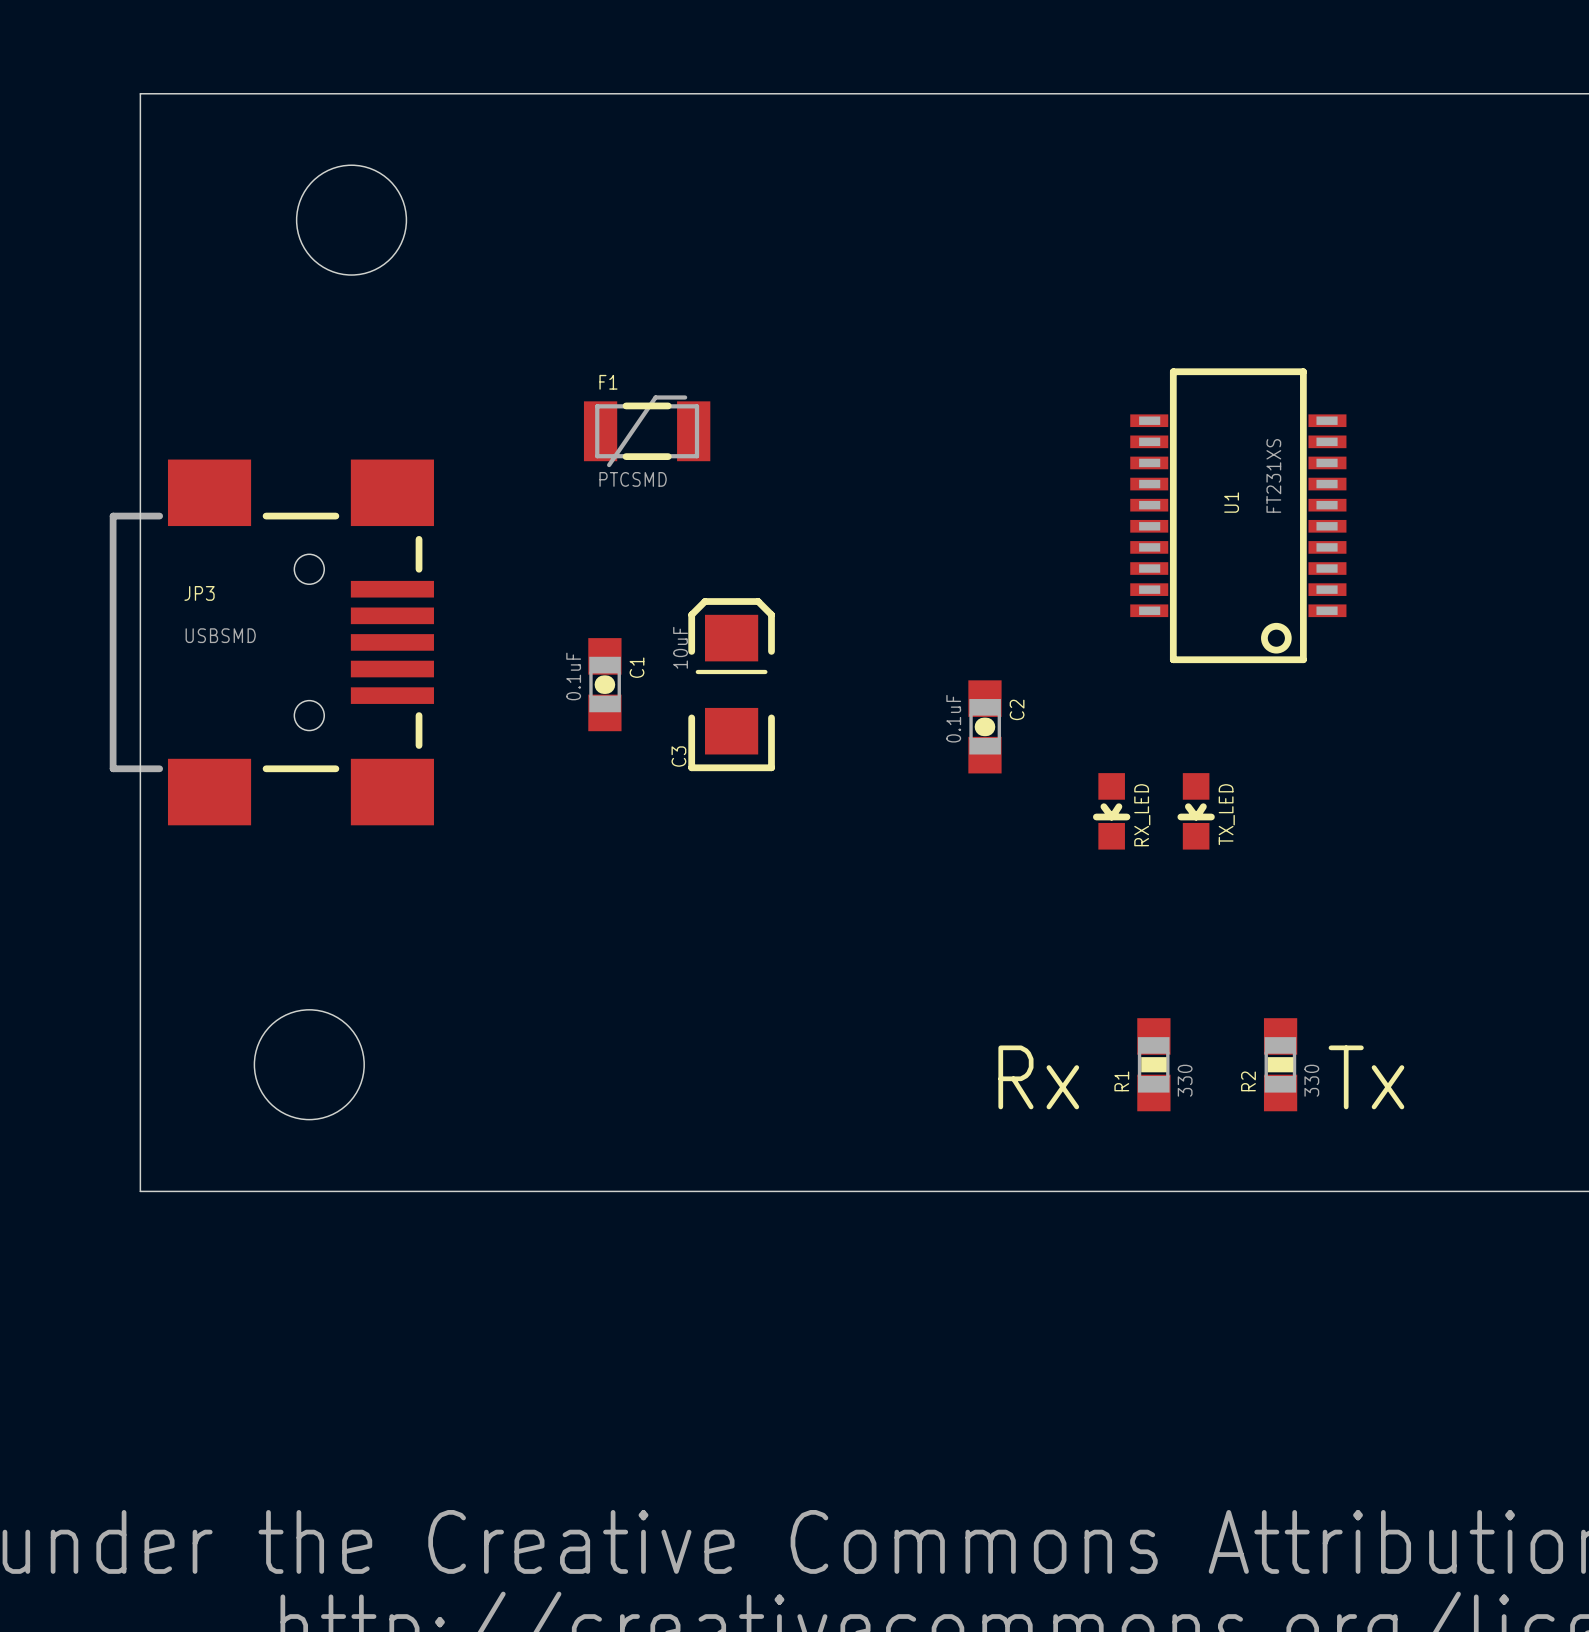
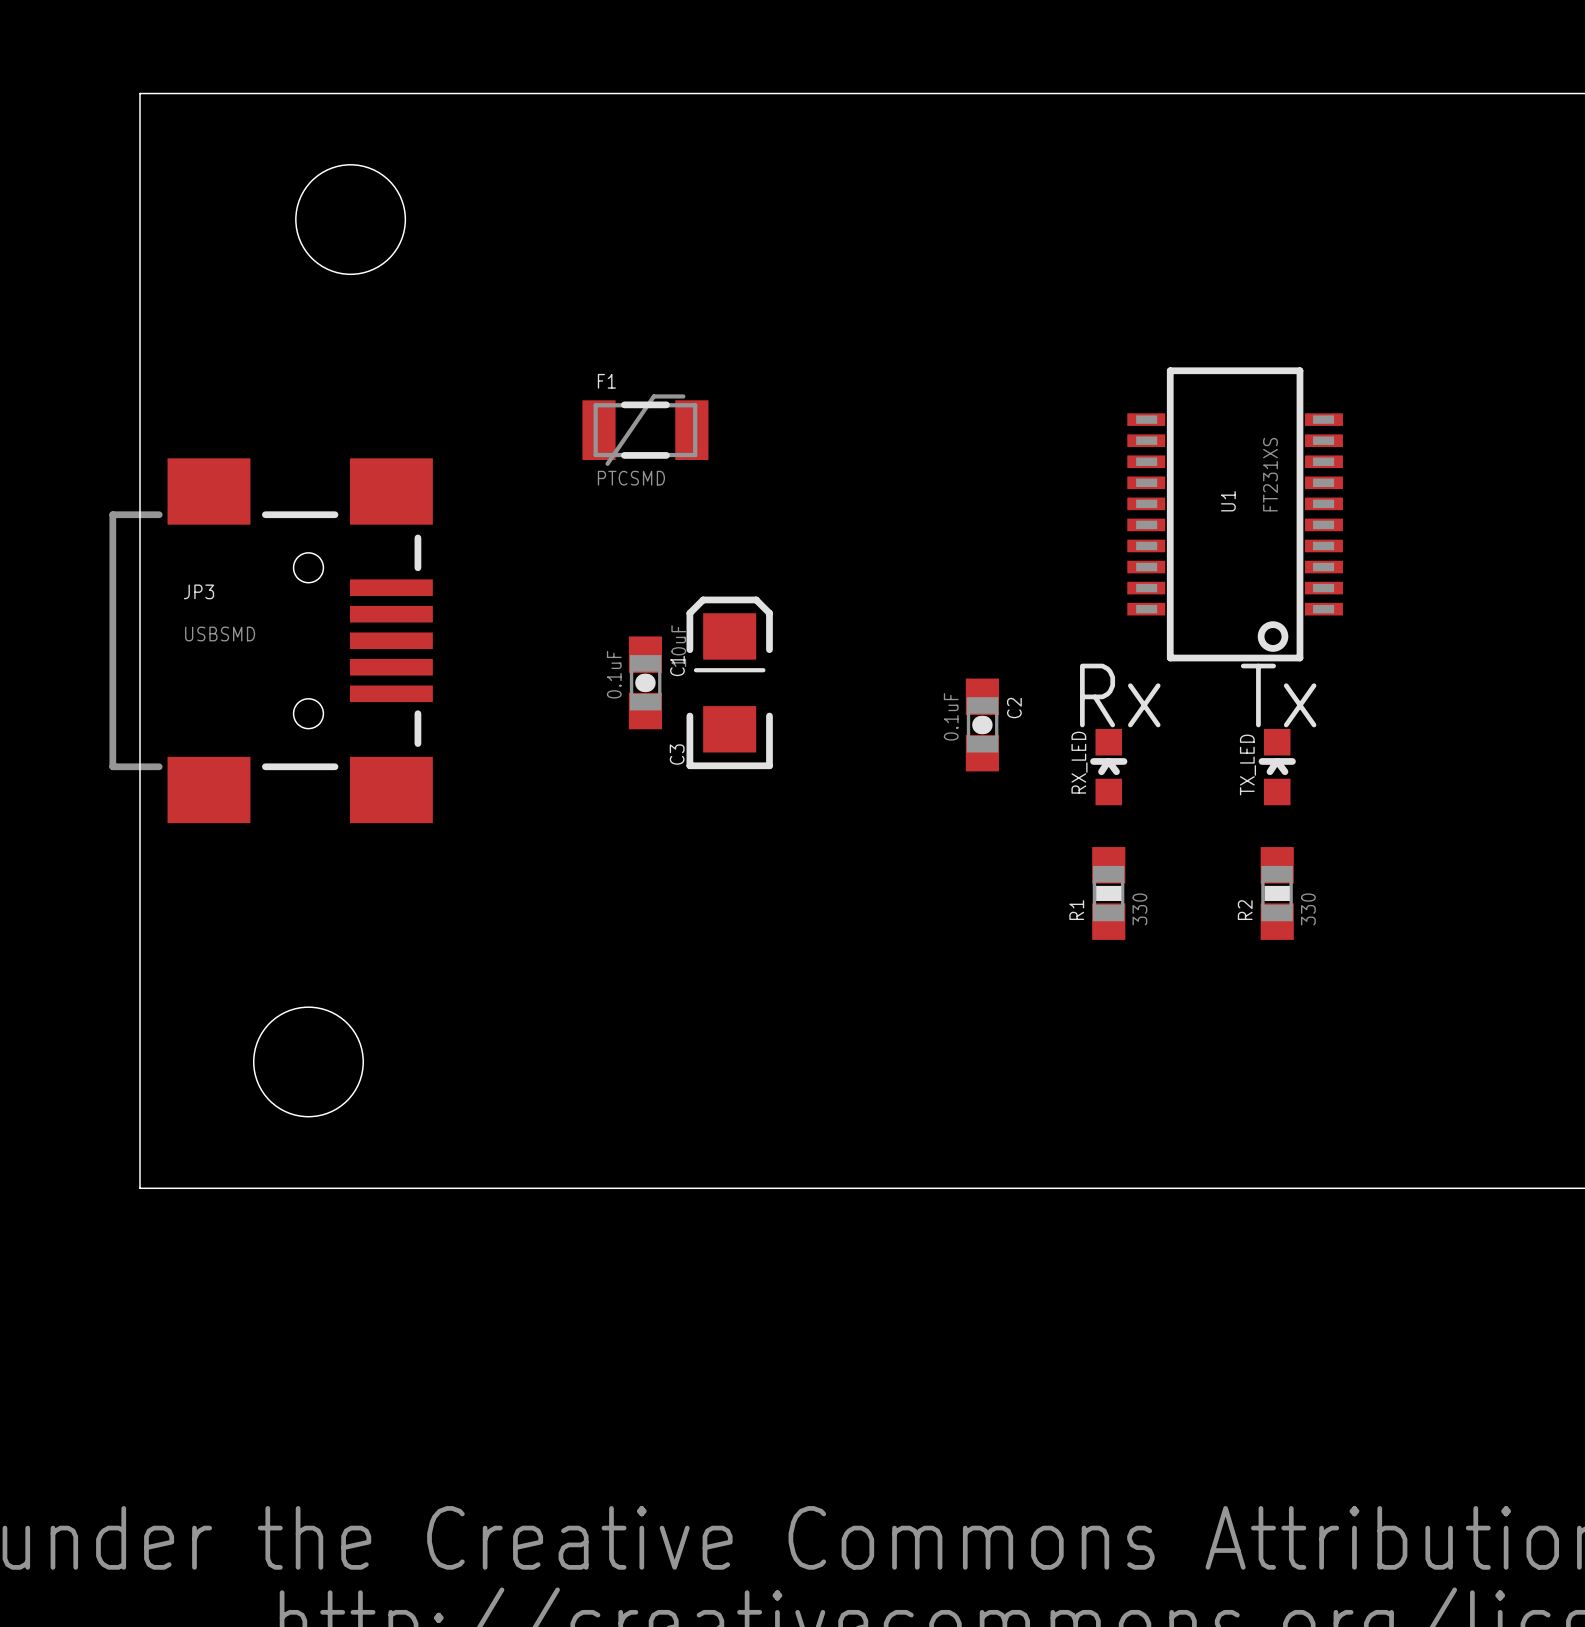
C1 position: (604, 684) -> (645, 682)
RX_LED rotation: 0° (1111, 811) -> 180° (1108, 767)
TX_LED rotation: 0° (1196, 811) -> 180° (1277, 767)
TX_LED position: (1196, 811) -> (1277, 767)
R1 position: (1153, 1064) -> (1108, 893)
R2 position: (1280, 1064) -> (1277, 893)
text position: Rx (1038, 1077) -> Rx (1120, 695)
text position: Tx (1366, 1077) -> Tx (1278, 695)

